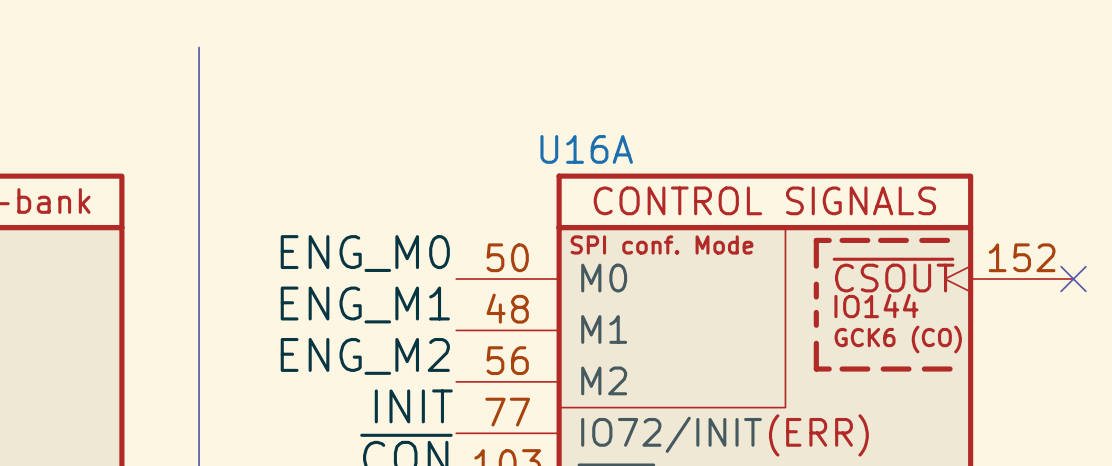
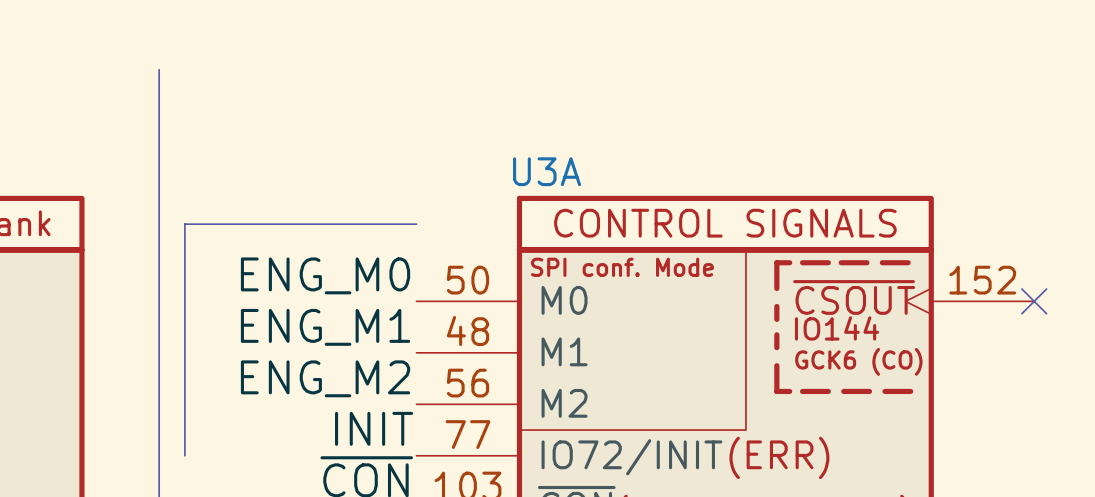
U16A name: U16A (586, 149) -> U3A (547, 171)
line: none -> (416, 224) (184, 224) (184, 455)

